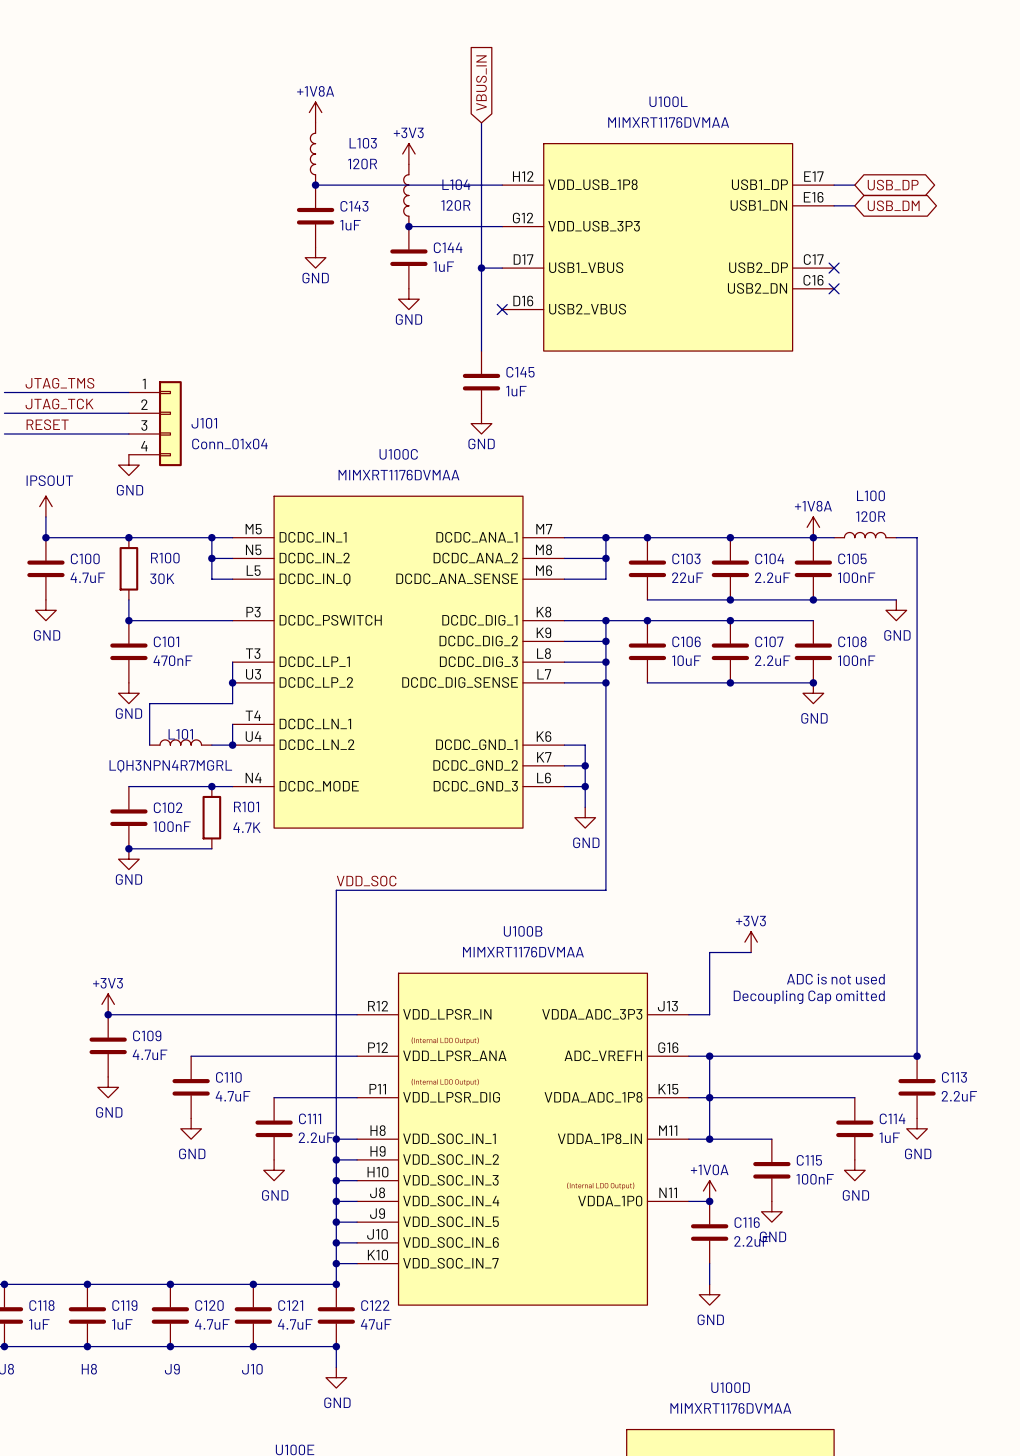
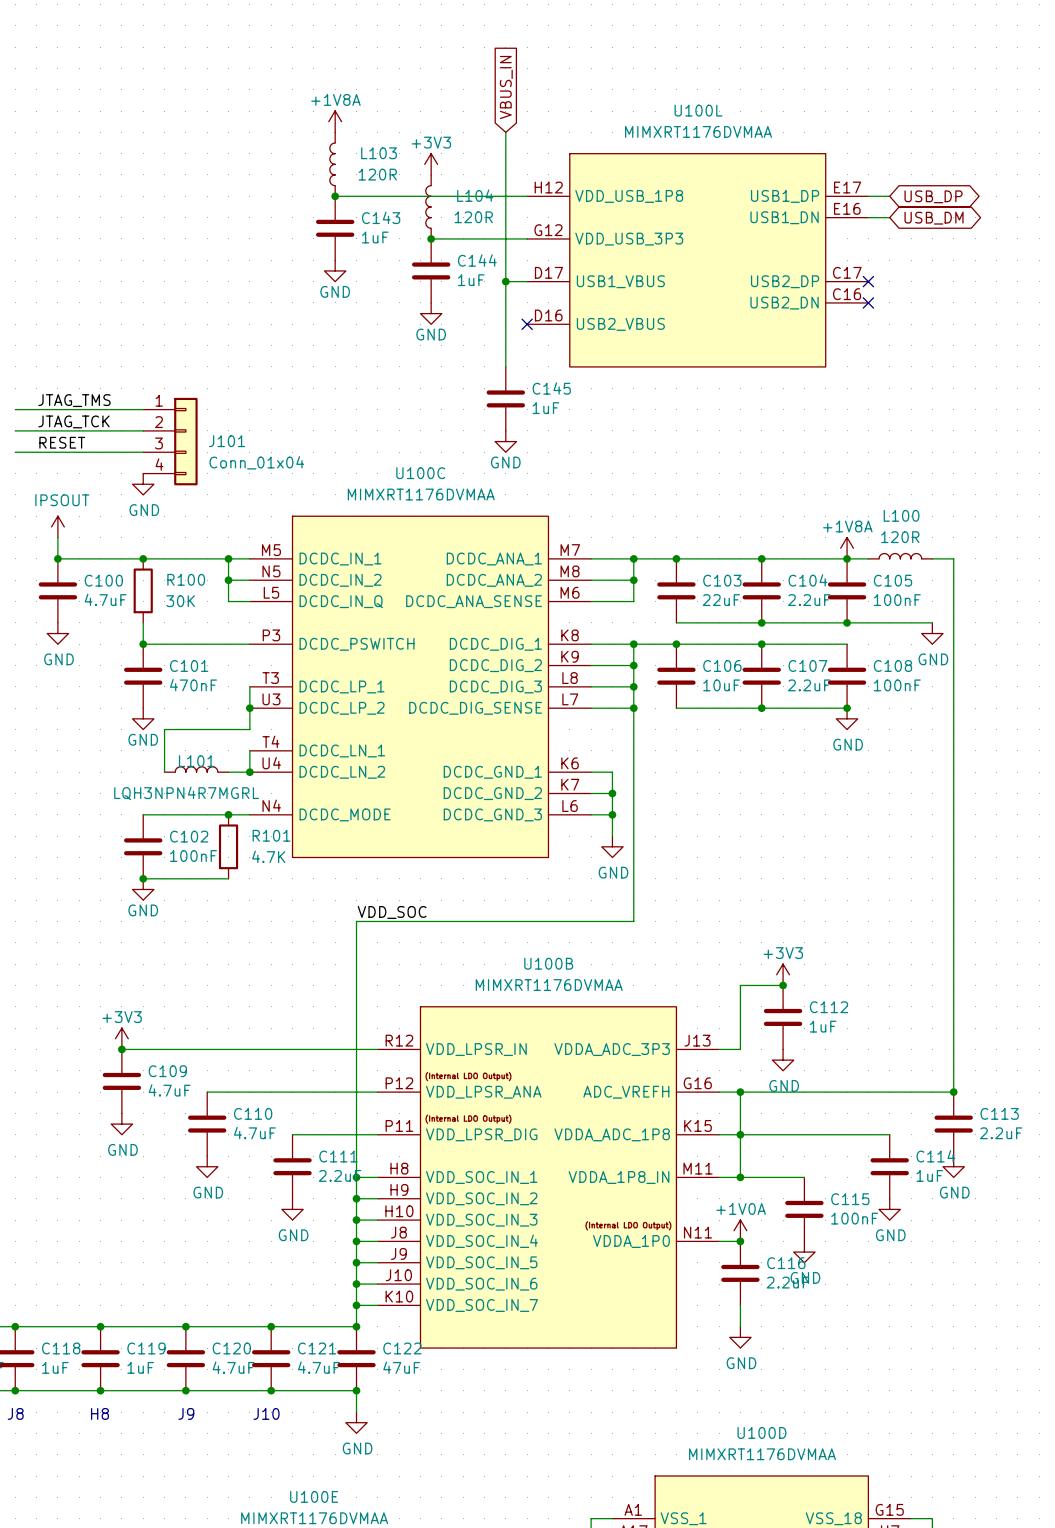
junction: none -> (783, 985)
text: ADC is not used (835, 979) -> none
C112: none -> 1uF (783, 1017)
text: Decoupling Cap omitted (809, 997) -> none
power symbol: none -> GND (783, 1060)

